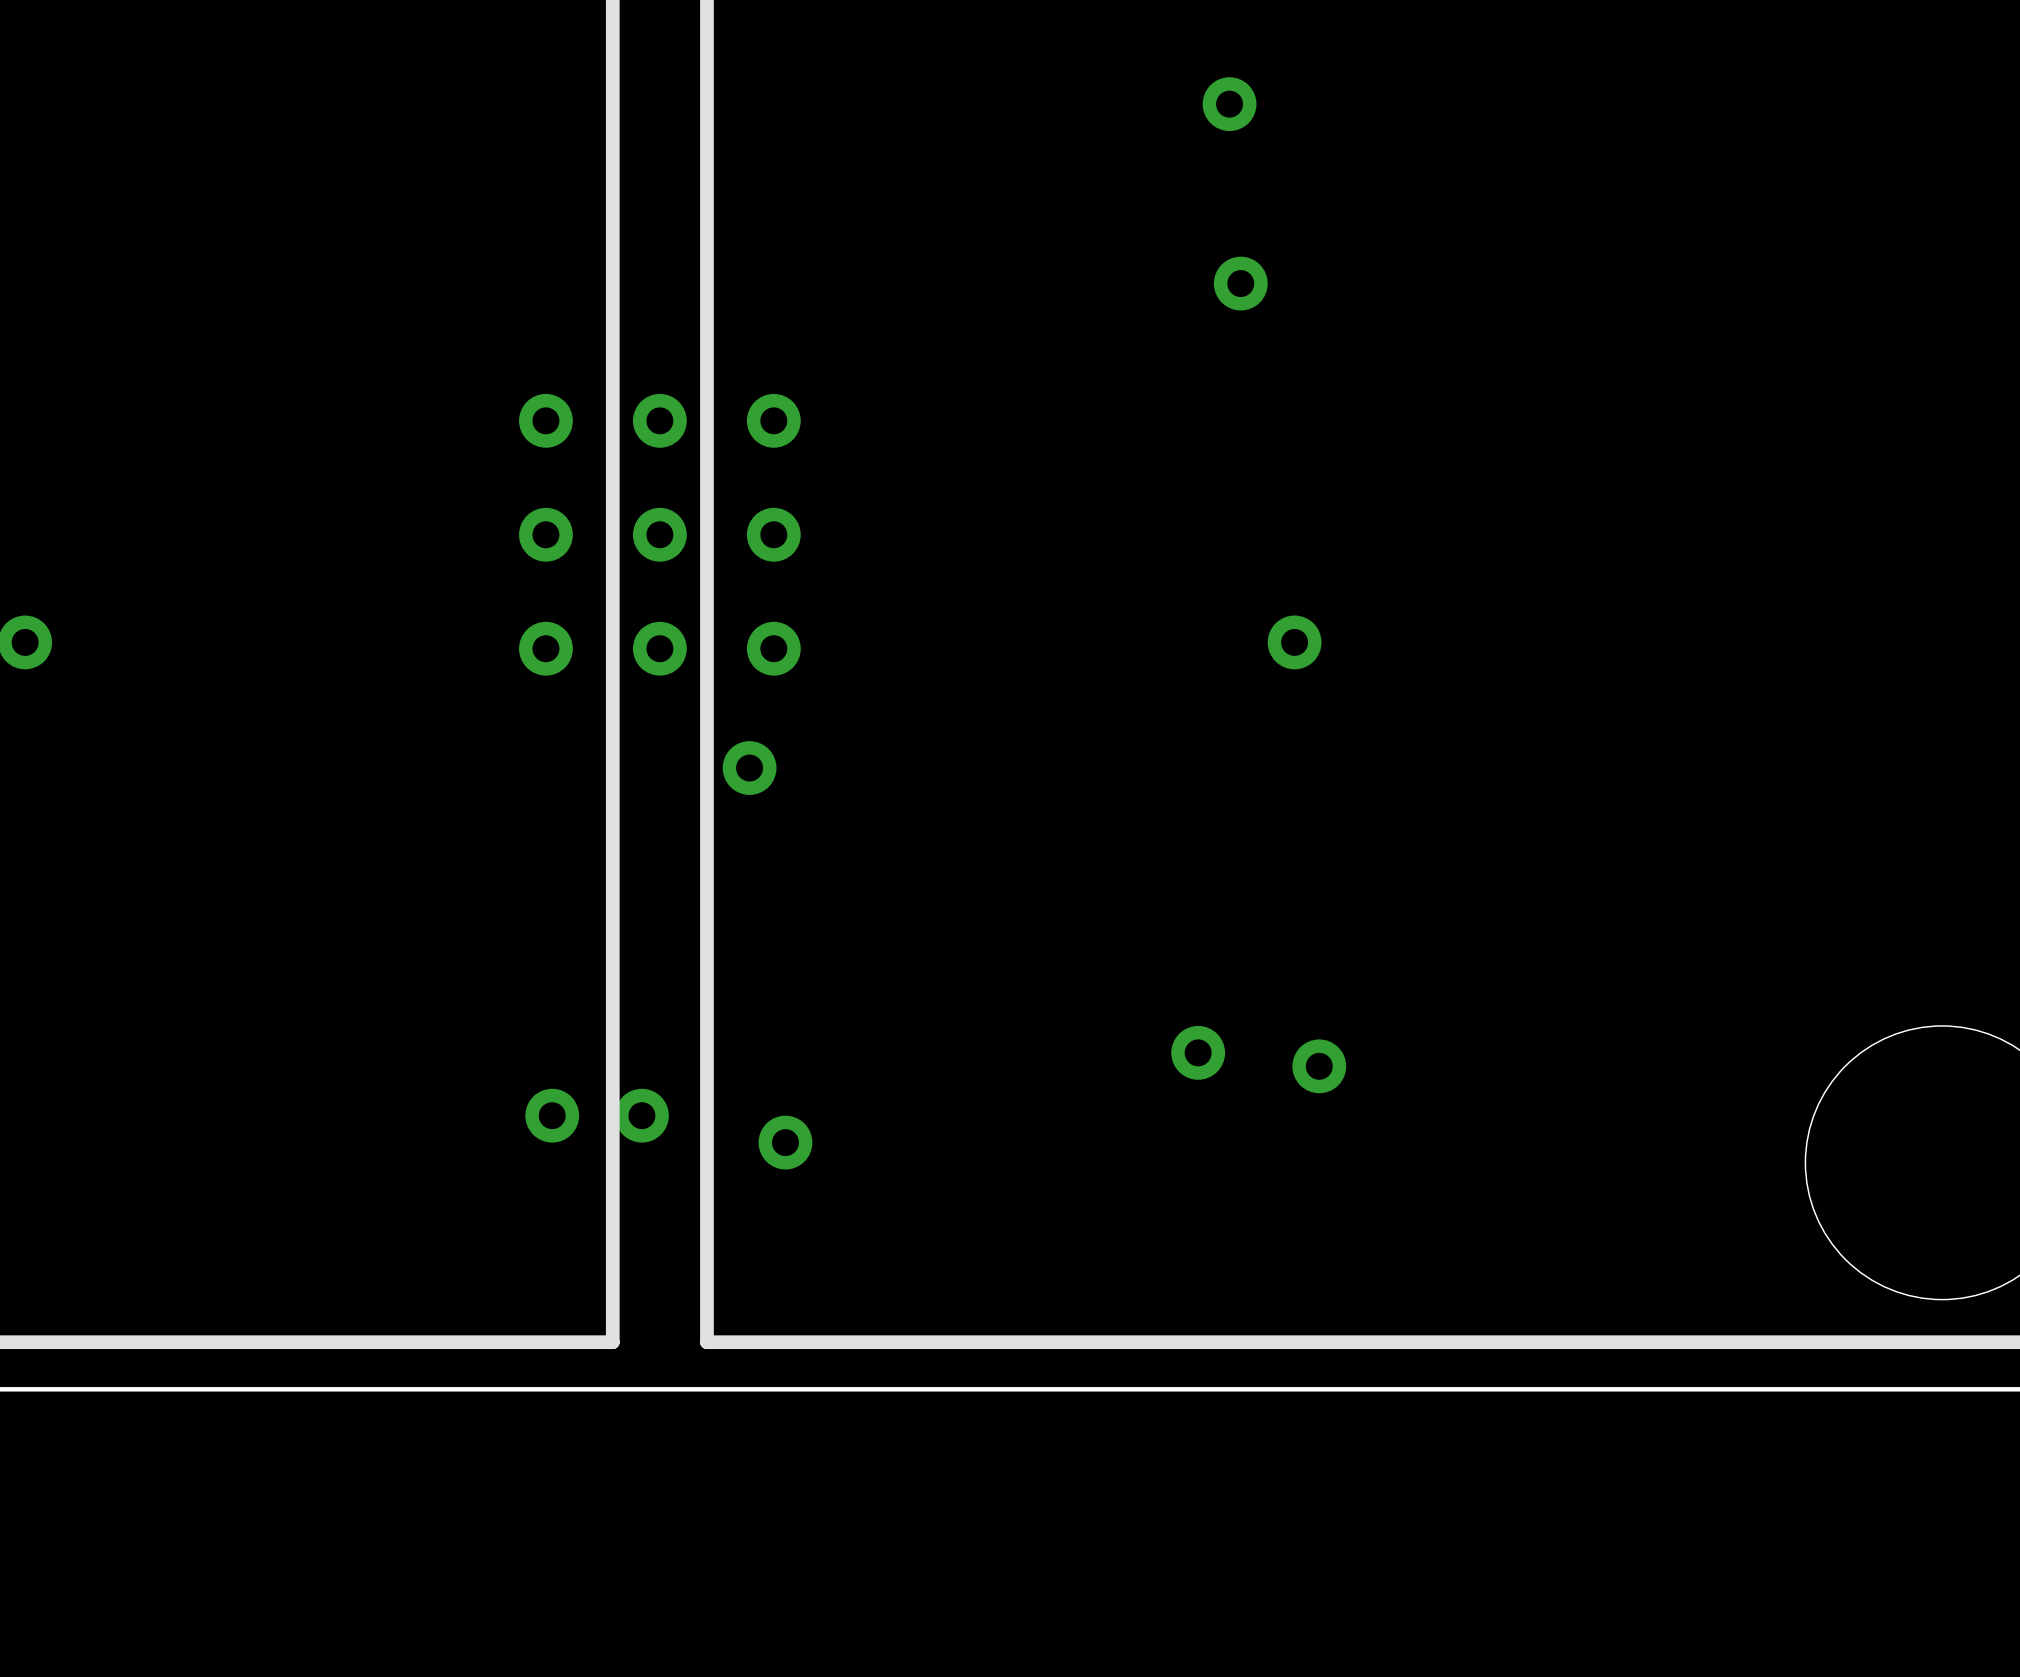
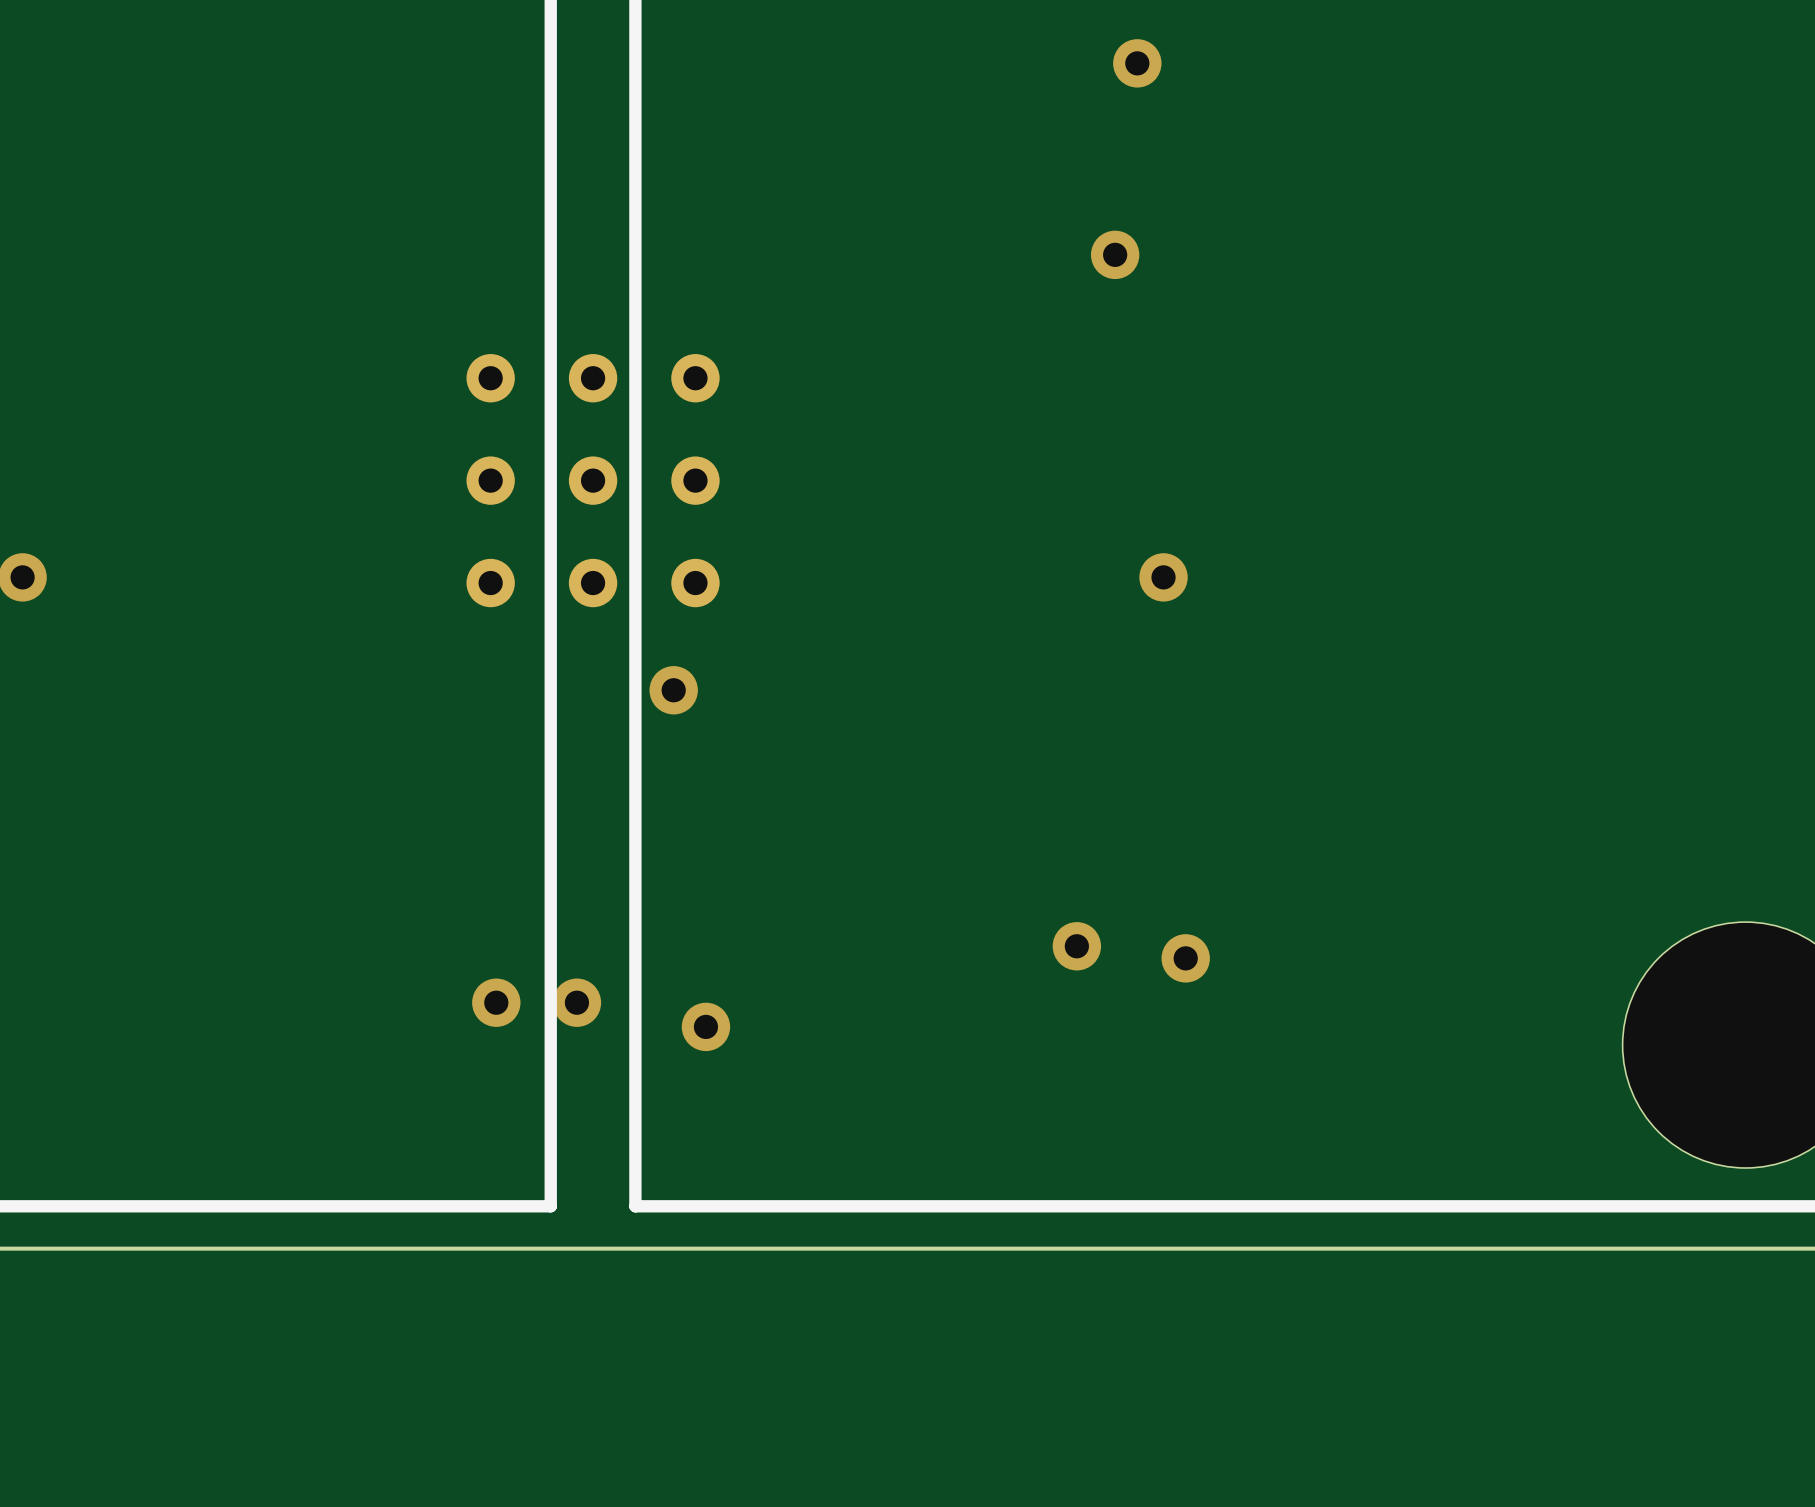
via position: (1229, 104) -> (1137, 63)

